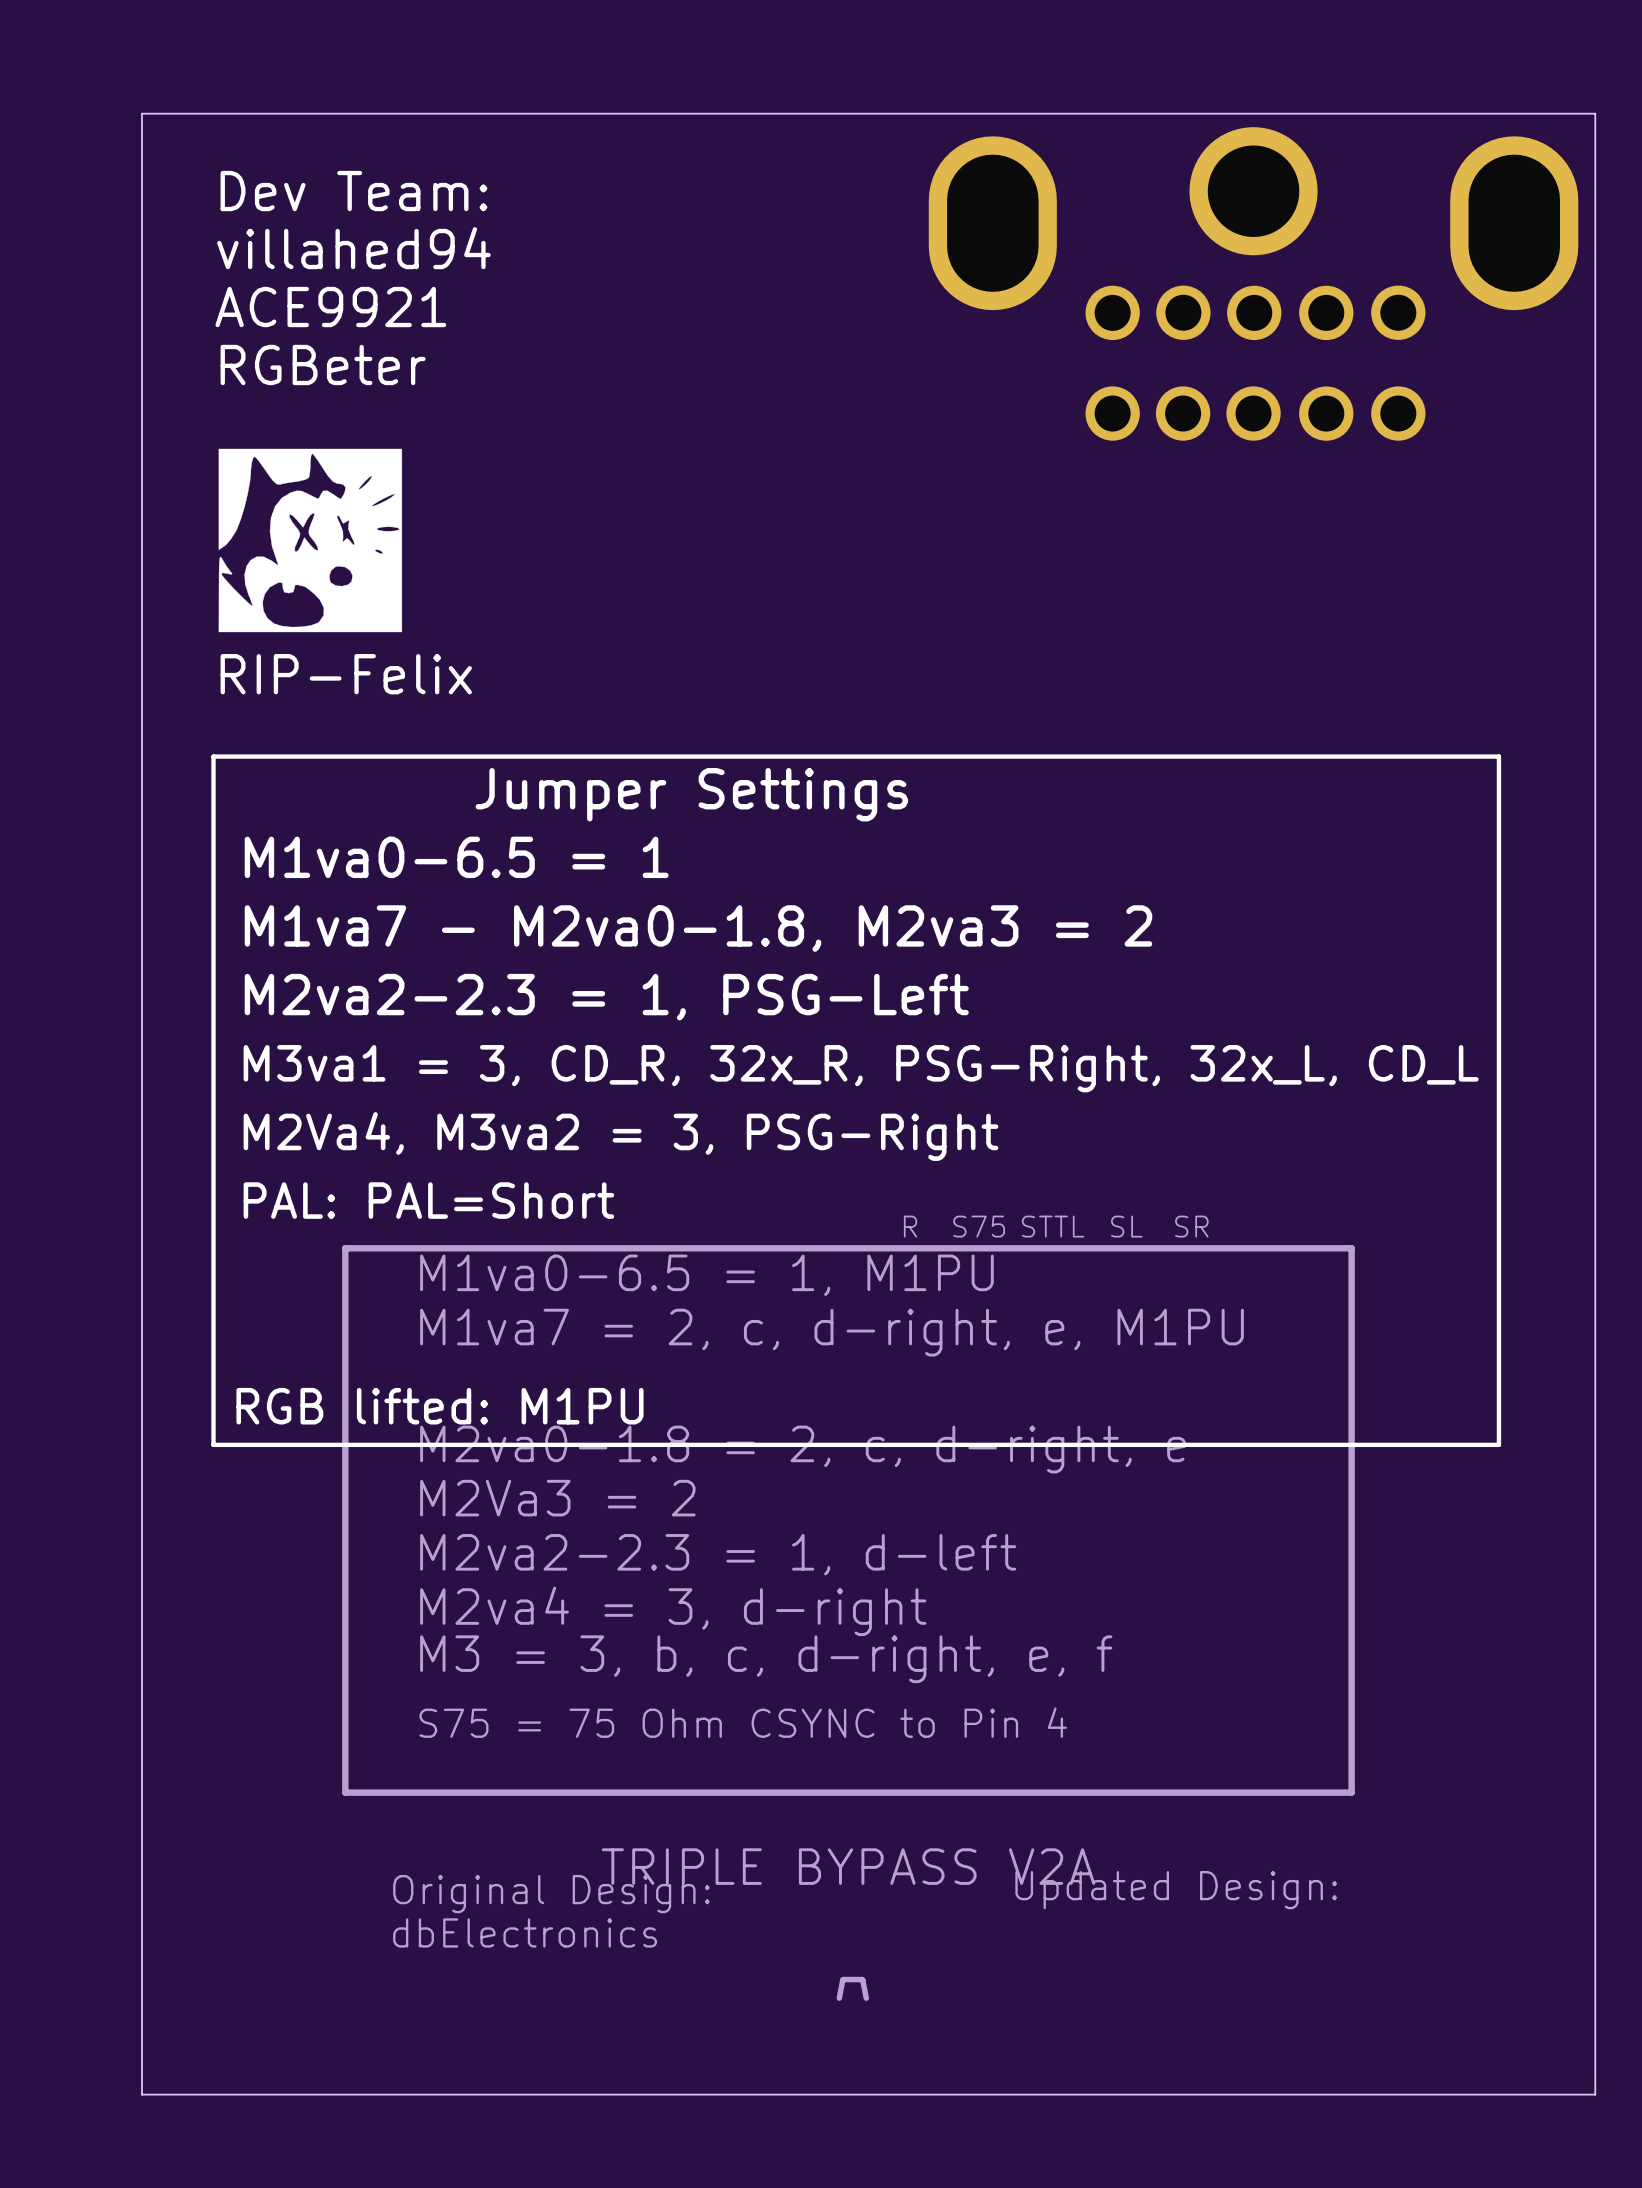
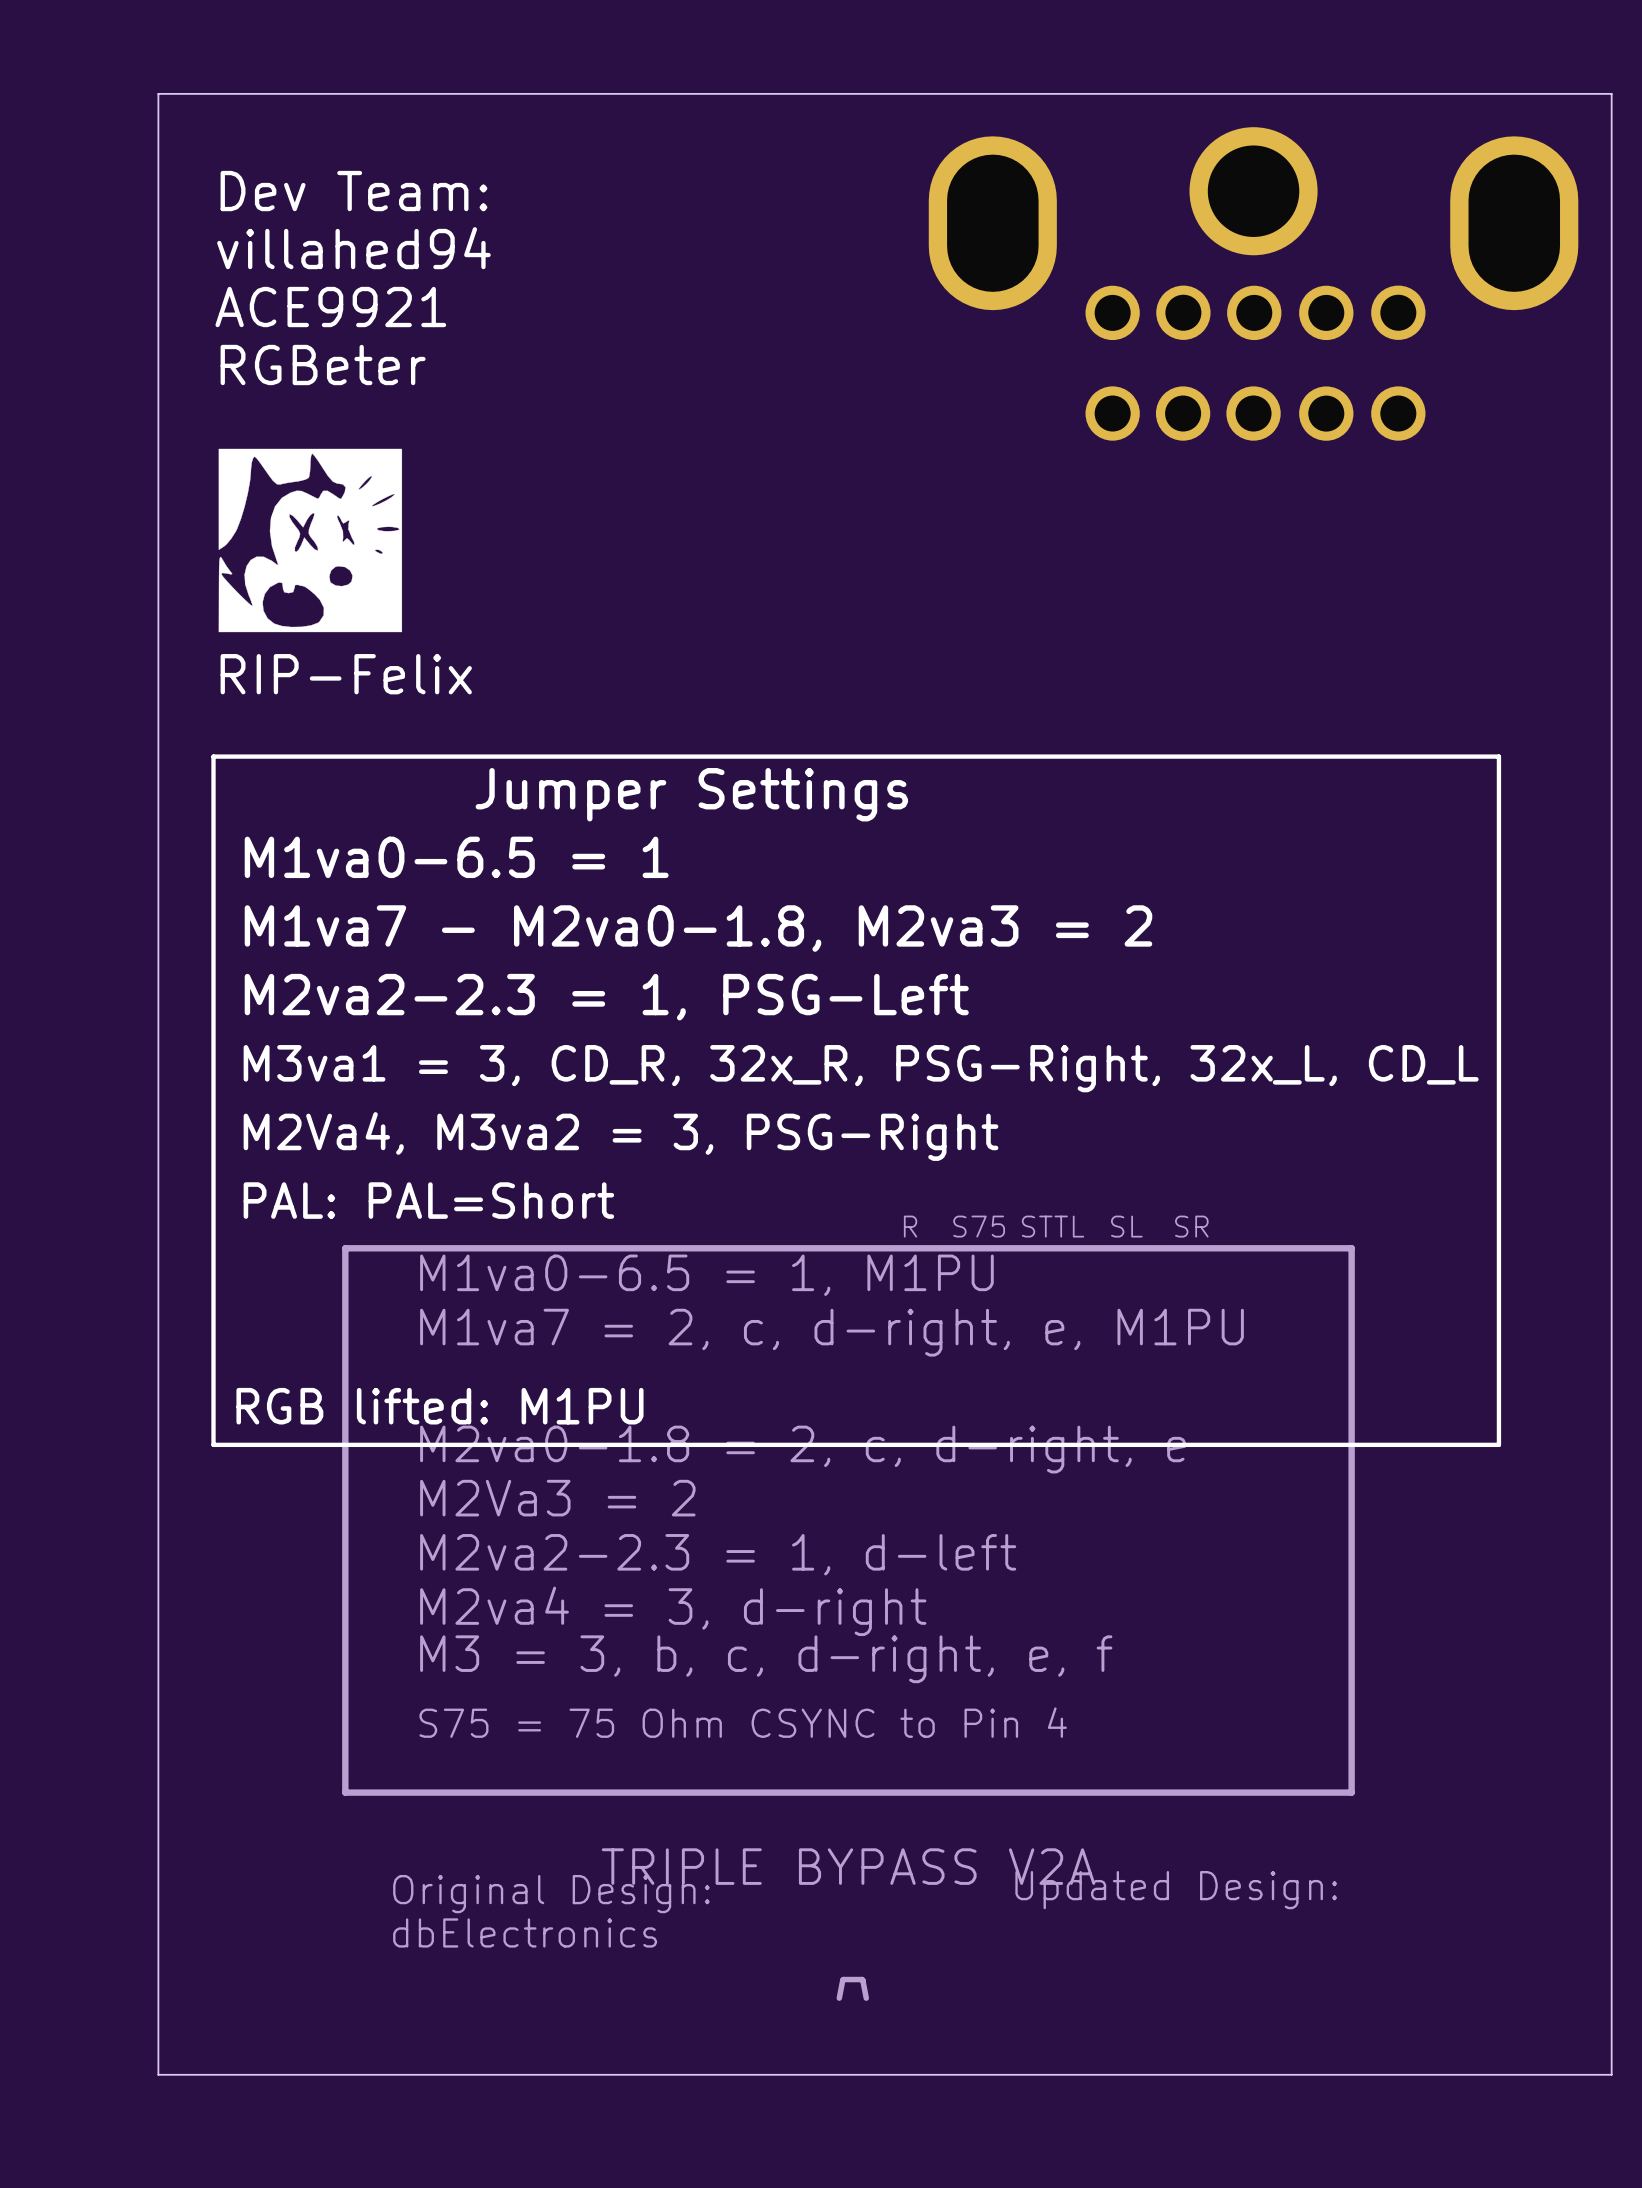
board edge: (1595, 113) (142, 113) (142, 2094) (1595, 2094) (1595, 113) -> (1611, 93) (158, 93) (158, 2074) (1611, 2074) (1611, 93)

